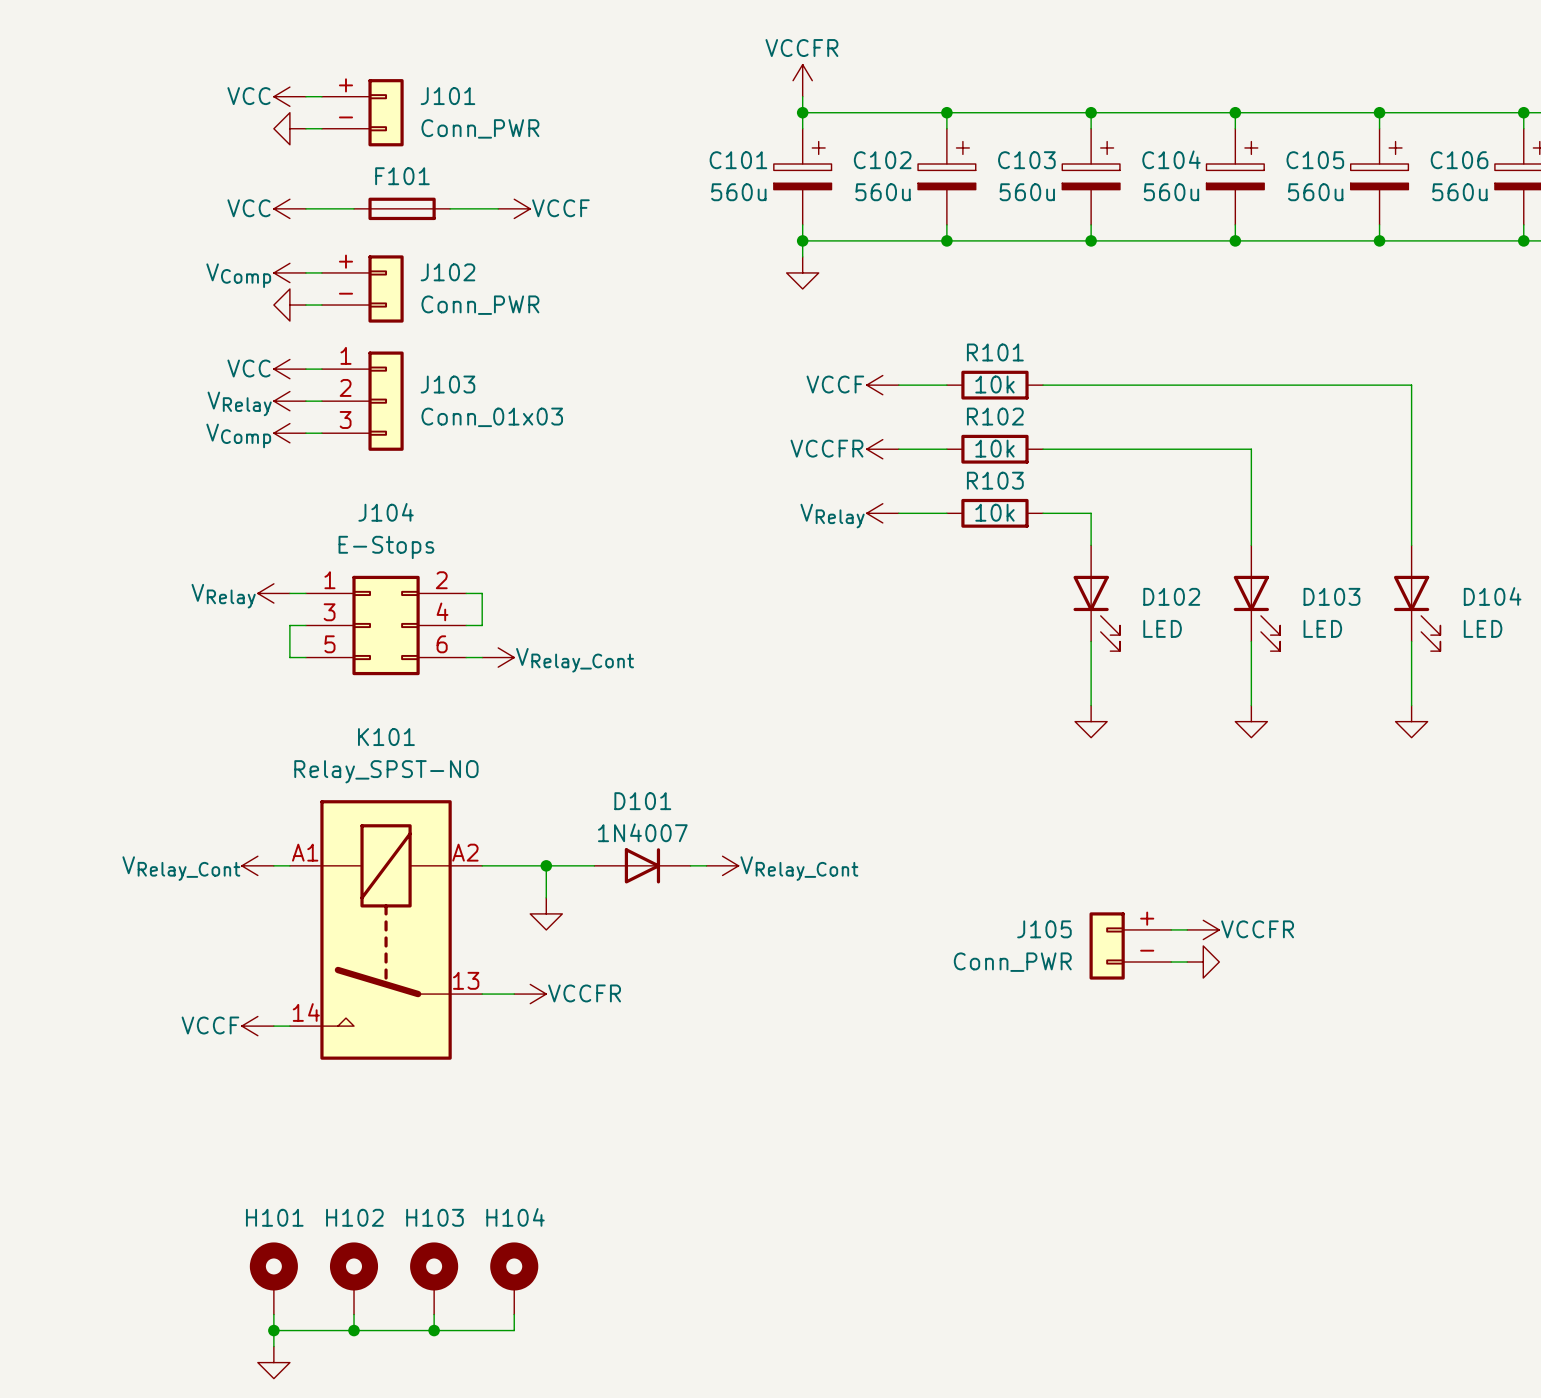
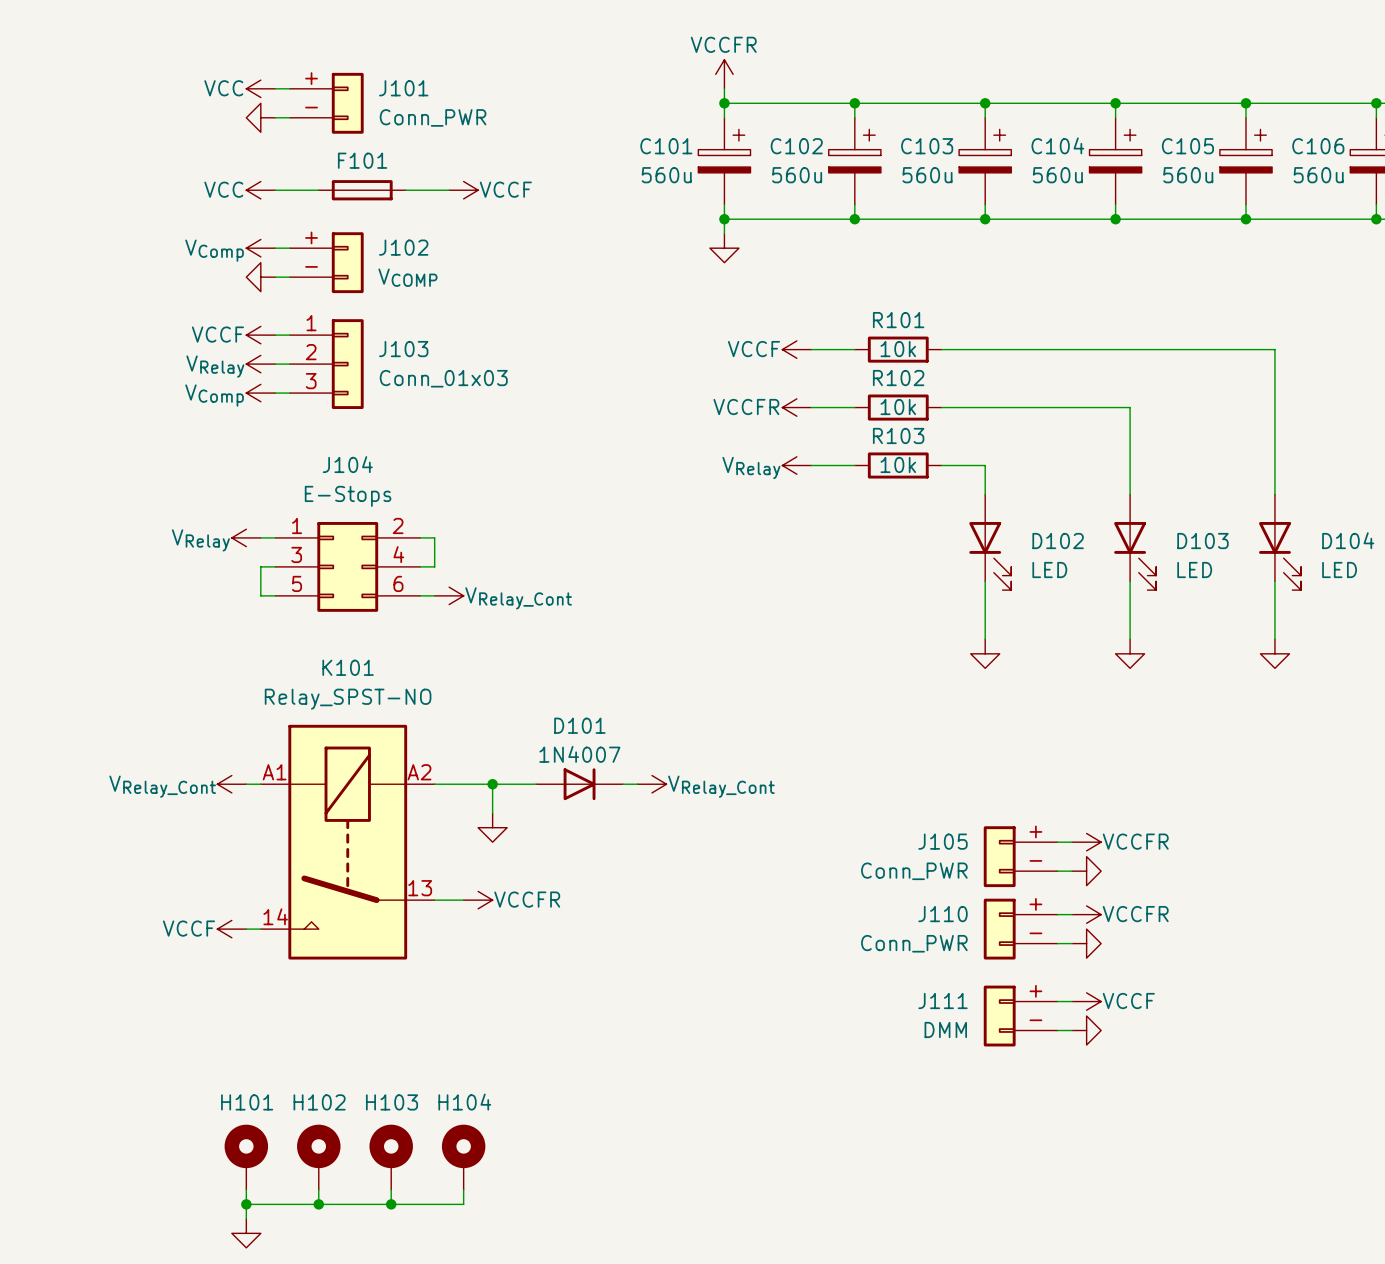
J102 value: Conn_PWR (480, 305) -> VCOMP (407, 277)
power symbol: VCC (289, 369) -> VCCF (260, 335)
wire: none -> (1057, 914) (1072, 914)
power symbol: none -> VCCFR (1086, 914)
J110: none -> Conn_PWR (1020, 929)
wire: none -> (1057, 943) (1072, 943)
power symbol: none -> (1086, 943)
wire: none -> (1057, 1001) (1072, 1001)
power symbol: none -> VCCF (1086, 1001)
J111: none -> DMM (1020, 1016)
wire: none -> (1057, 1030) (1072, 1030)
power symbol: none -> (1086, 1030)

